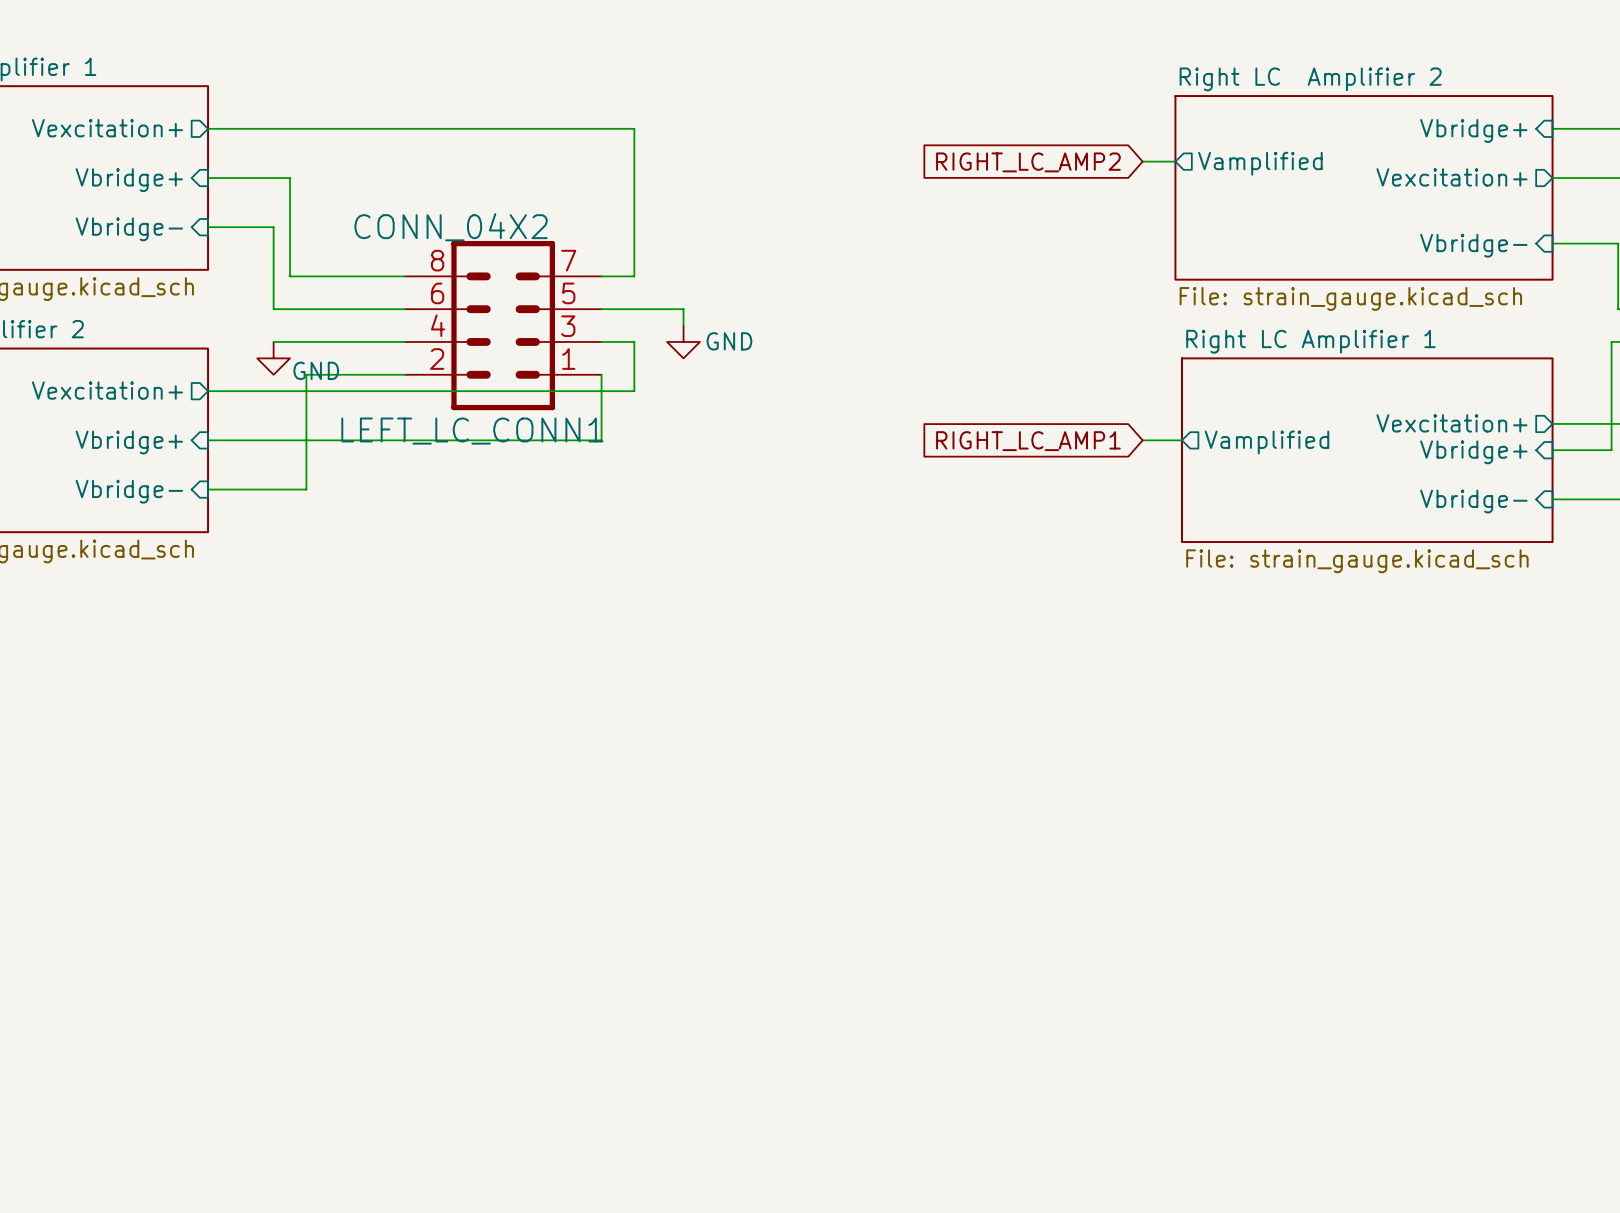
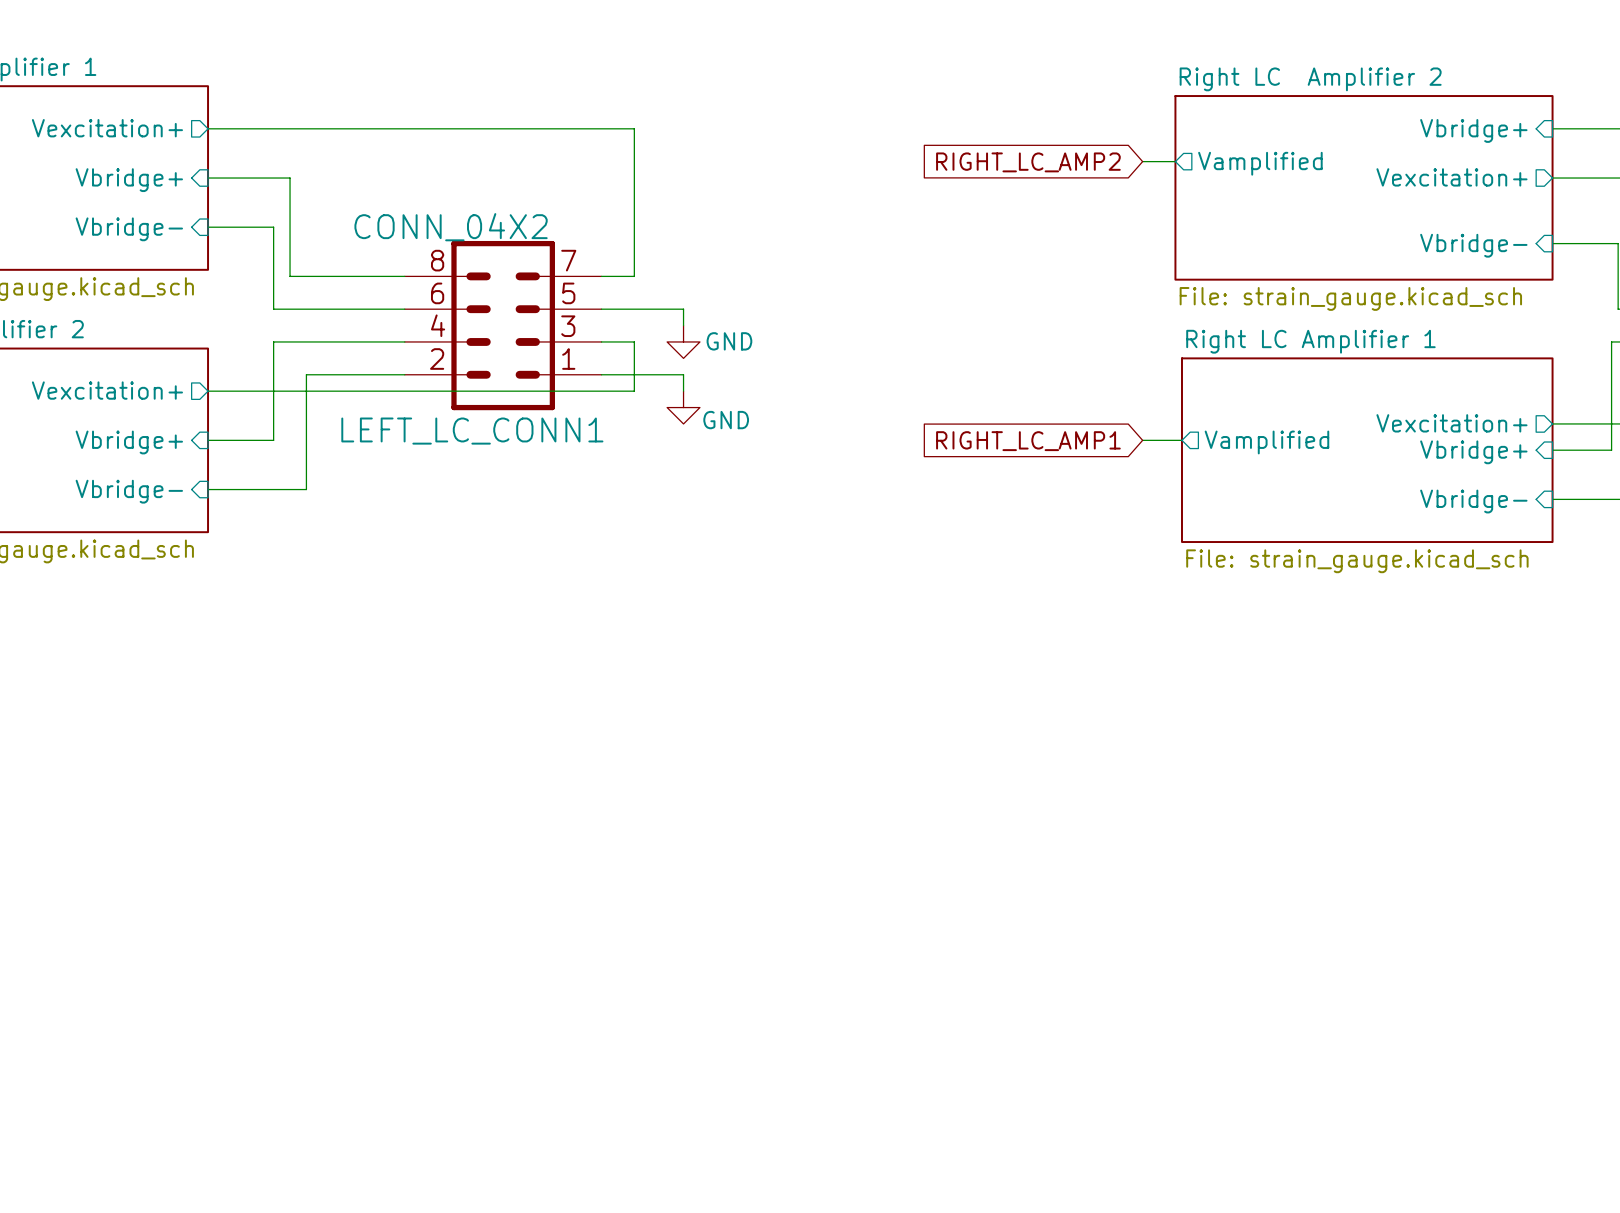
power symbol: GND (273, 358) -> none
wire: (601, 374) (601, 440) (273, 440) -> (273, 341) (273, 440)
wire: none -> (601, 374) (683, 374) (683, 391)
power symbol: none -> GND (683, 407)

